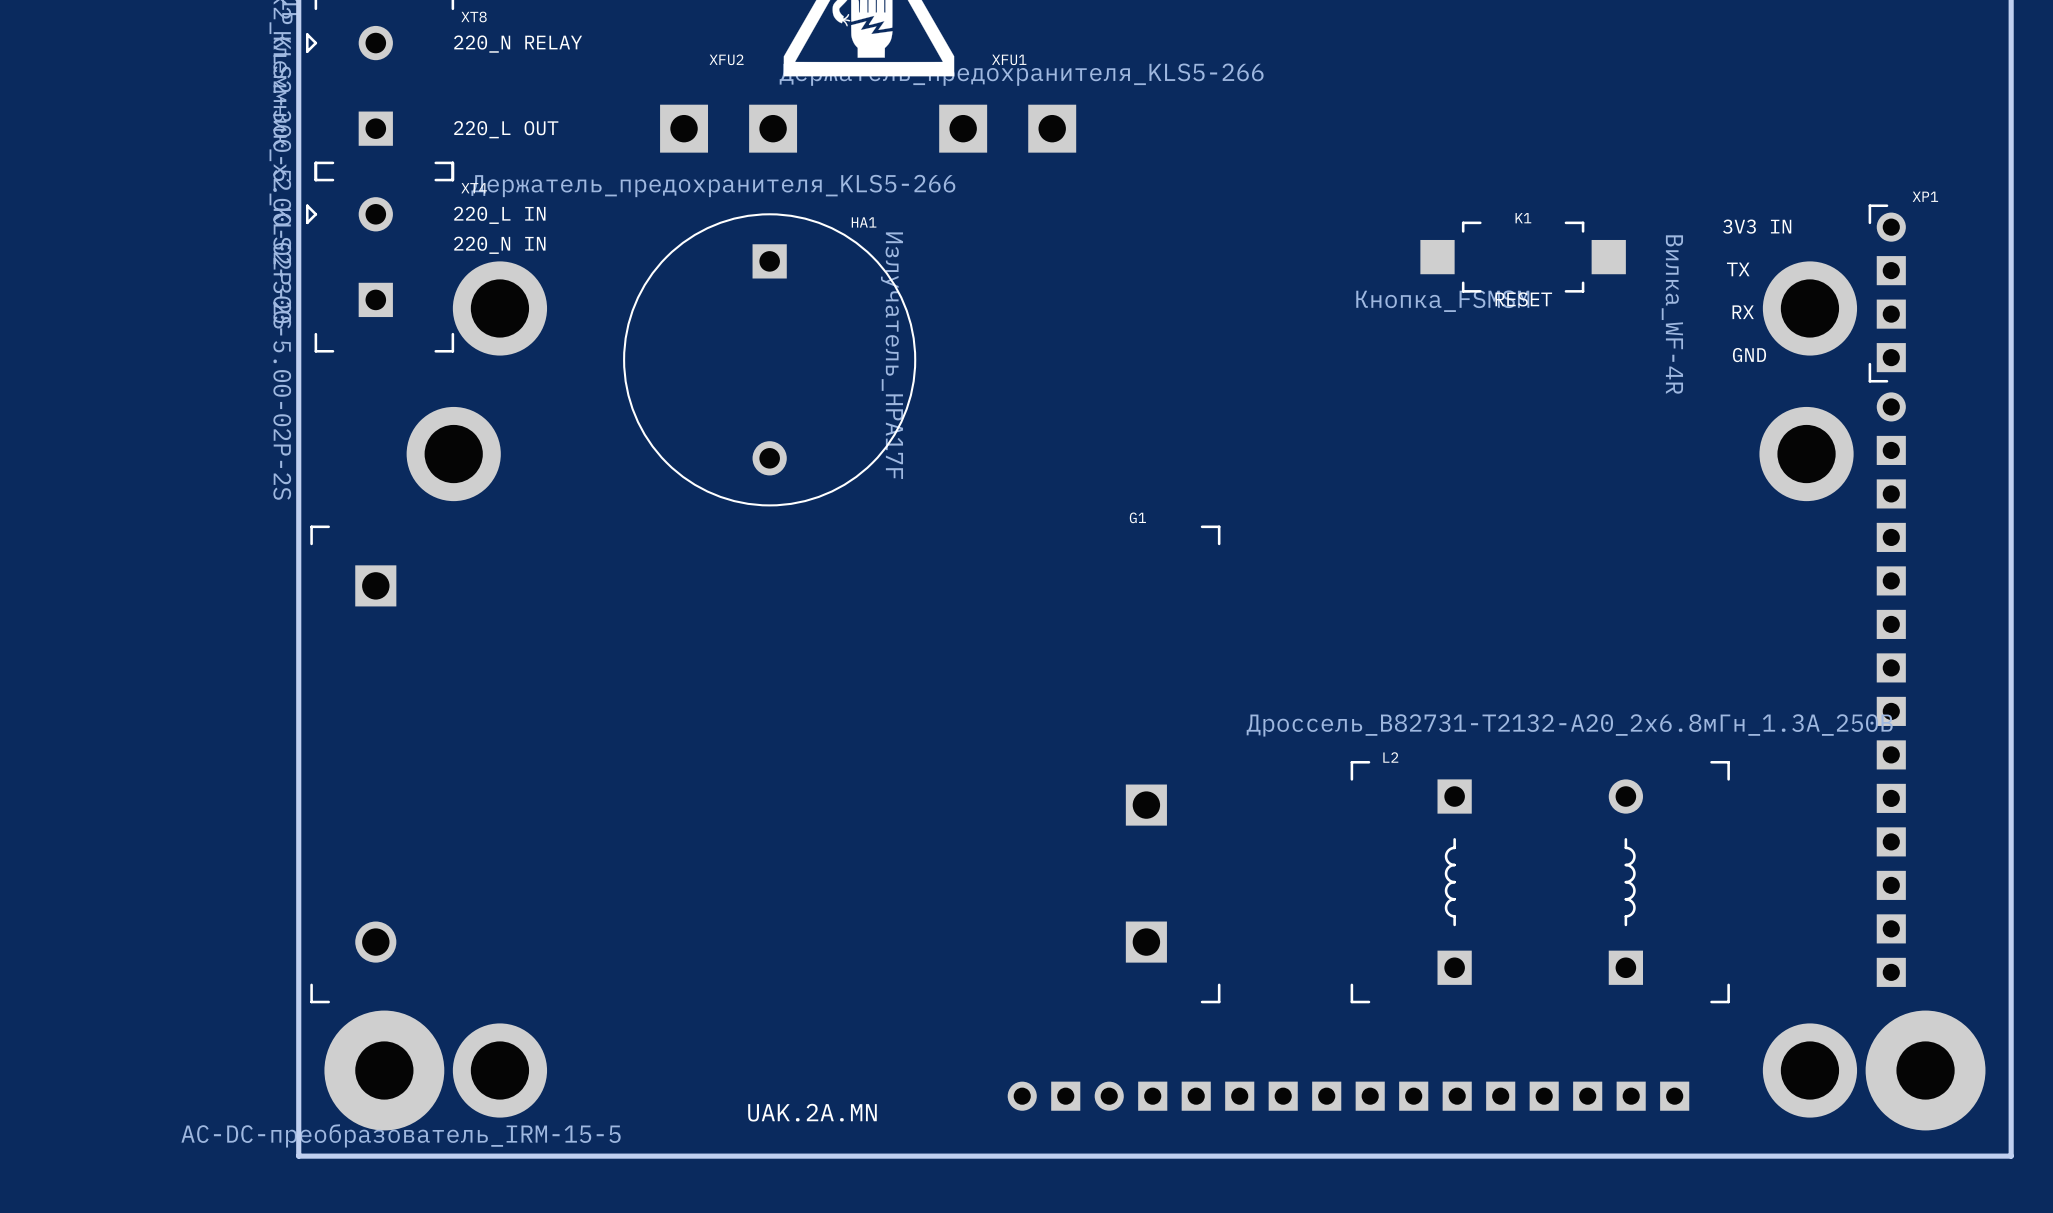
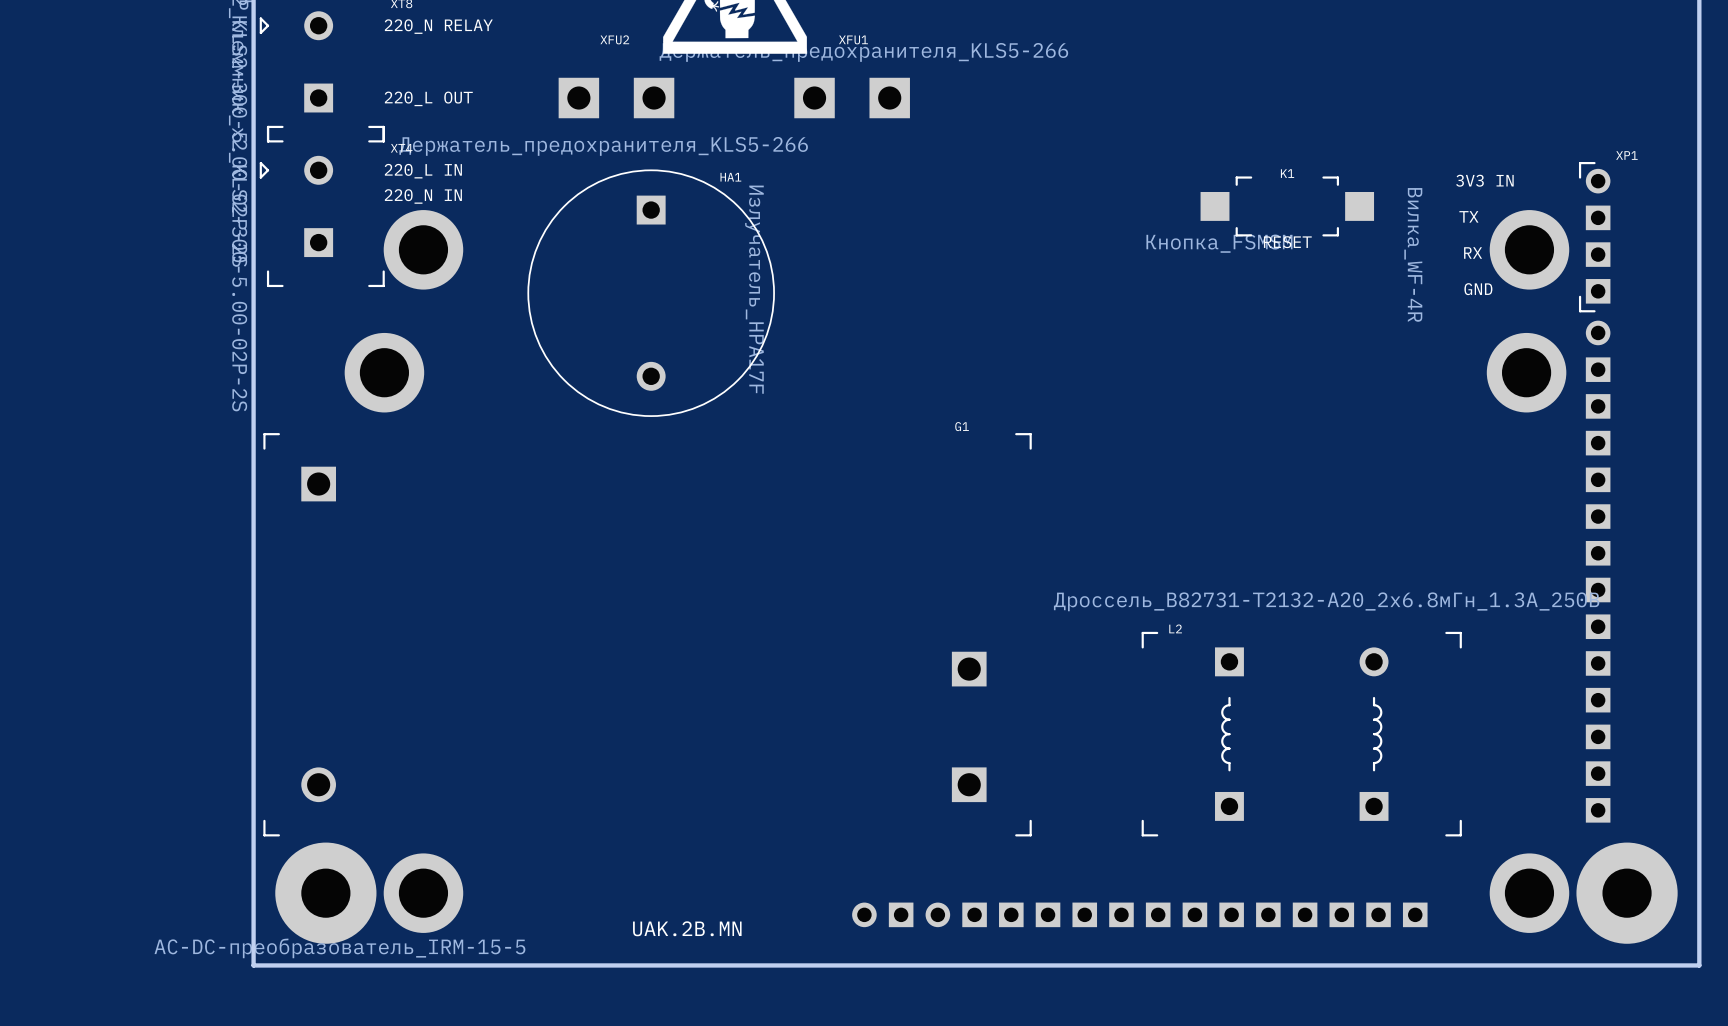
text: UAK.2A.MN (812, 1112) -> UAK.2B.MN (687, 928)

